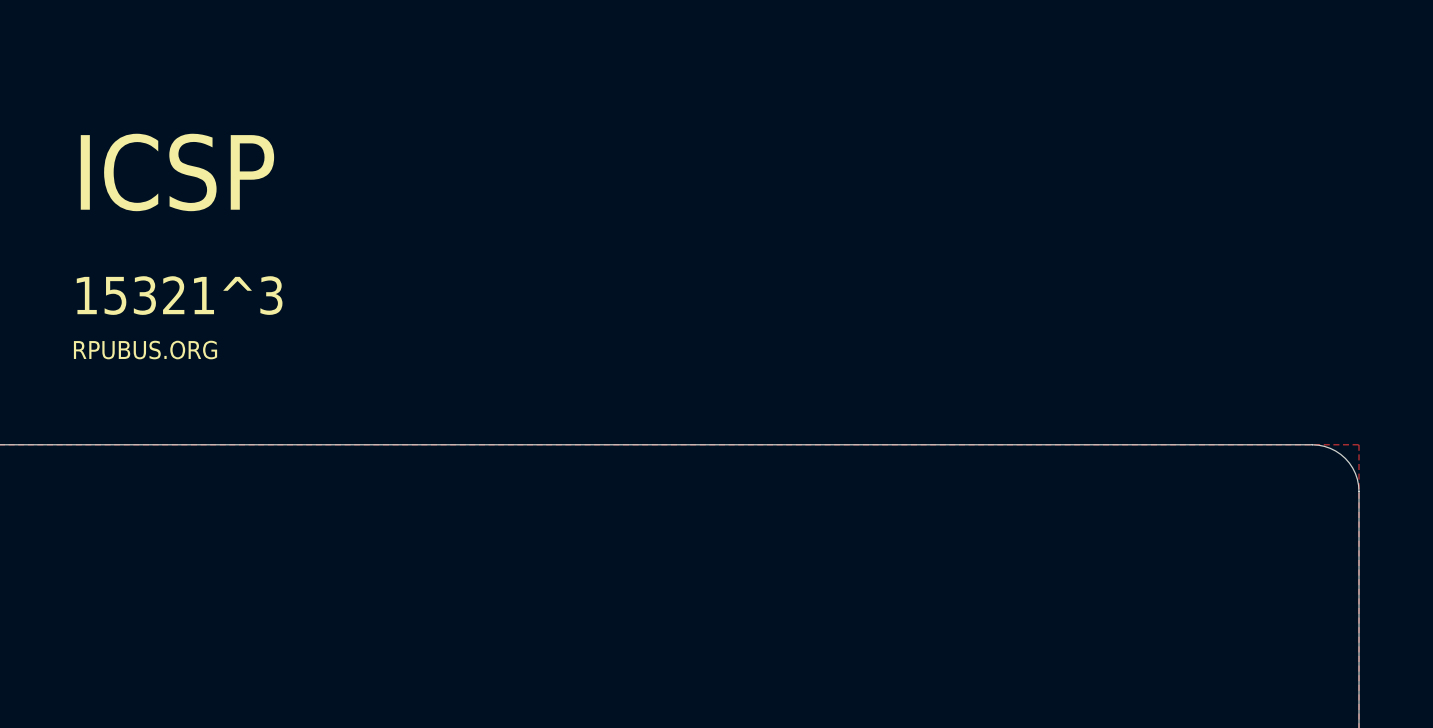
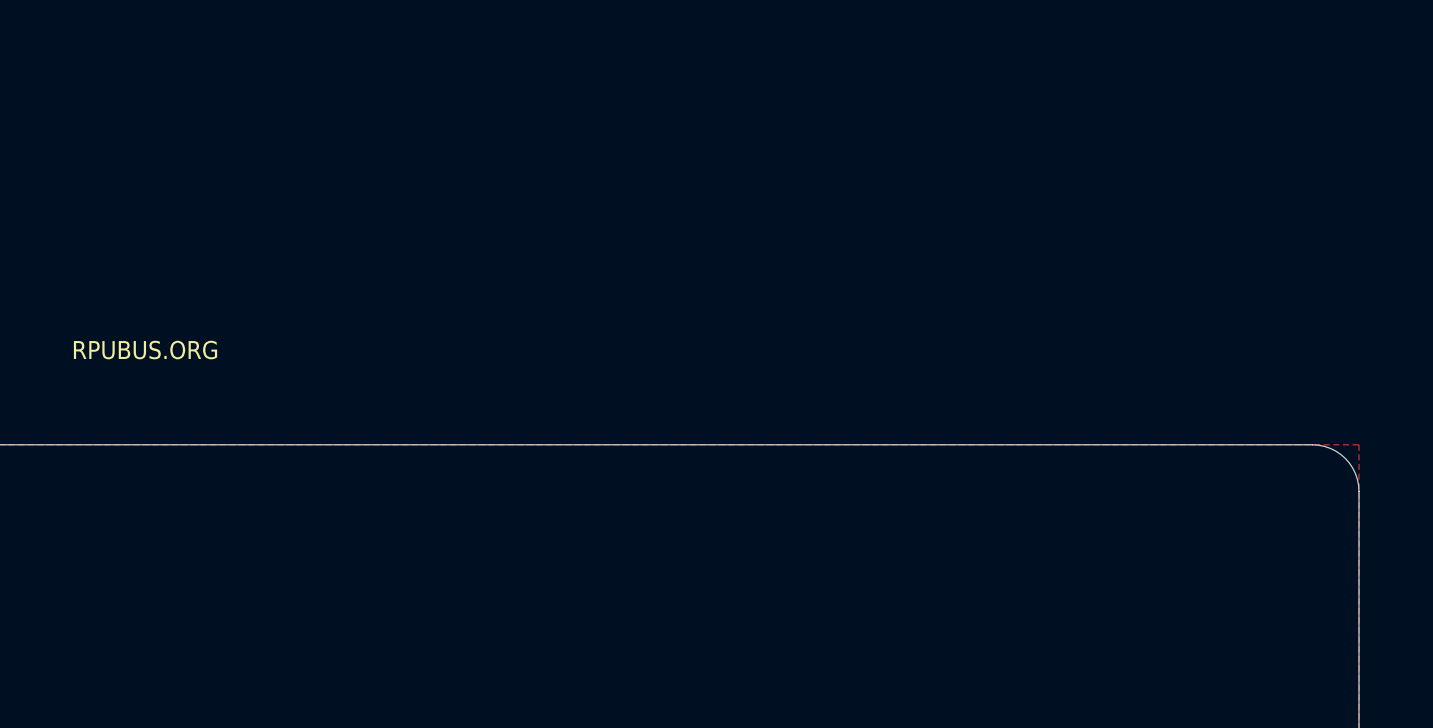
text: ICSP (177, 172) -> none
text: 15321^3 (179, 295) -> none

